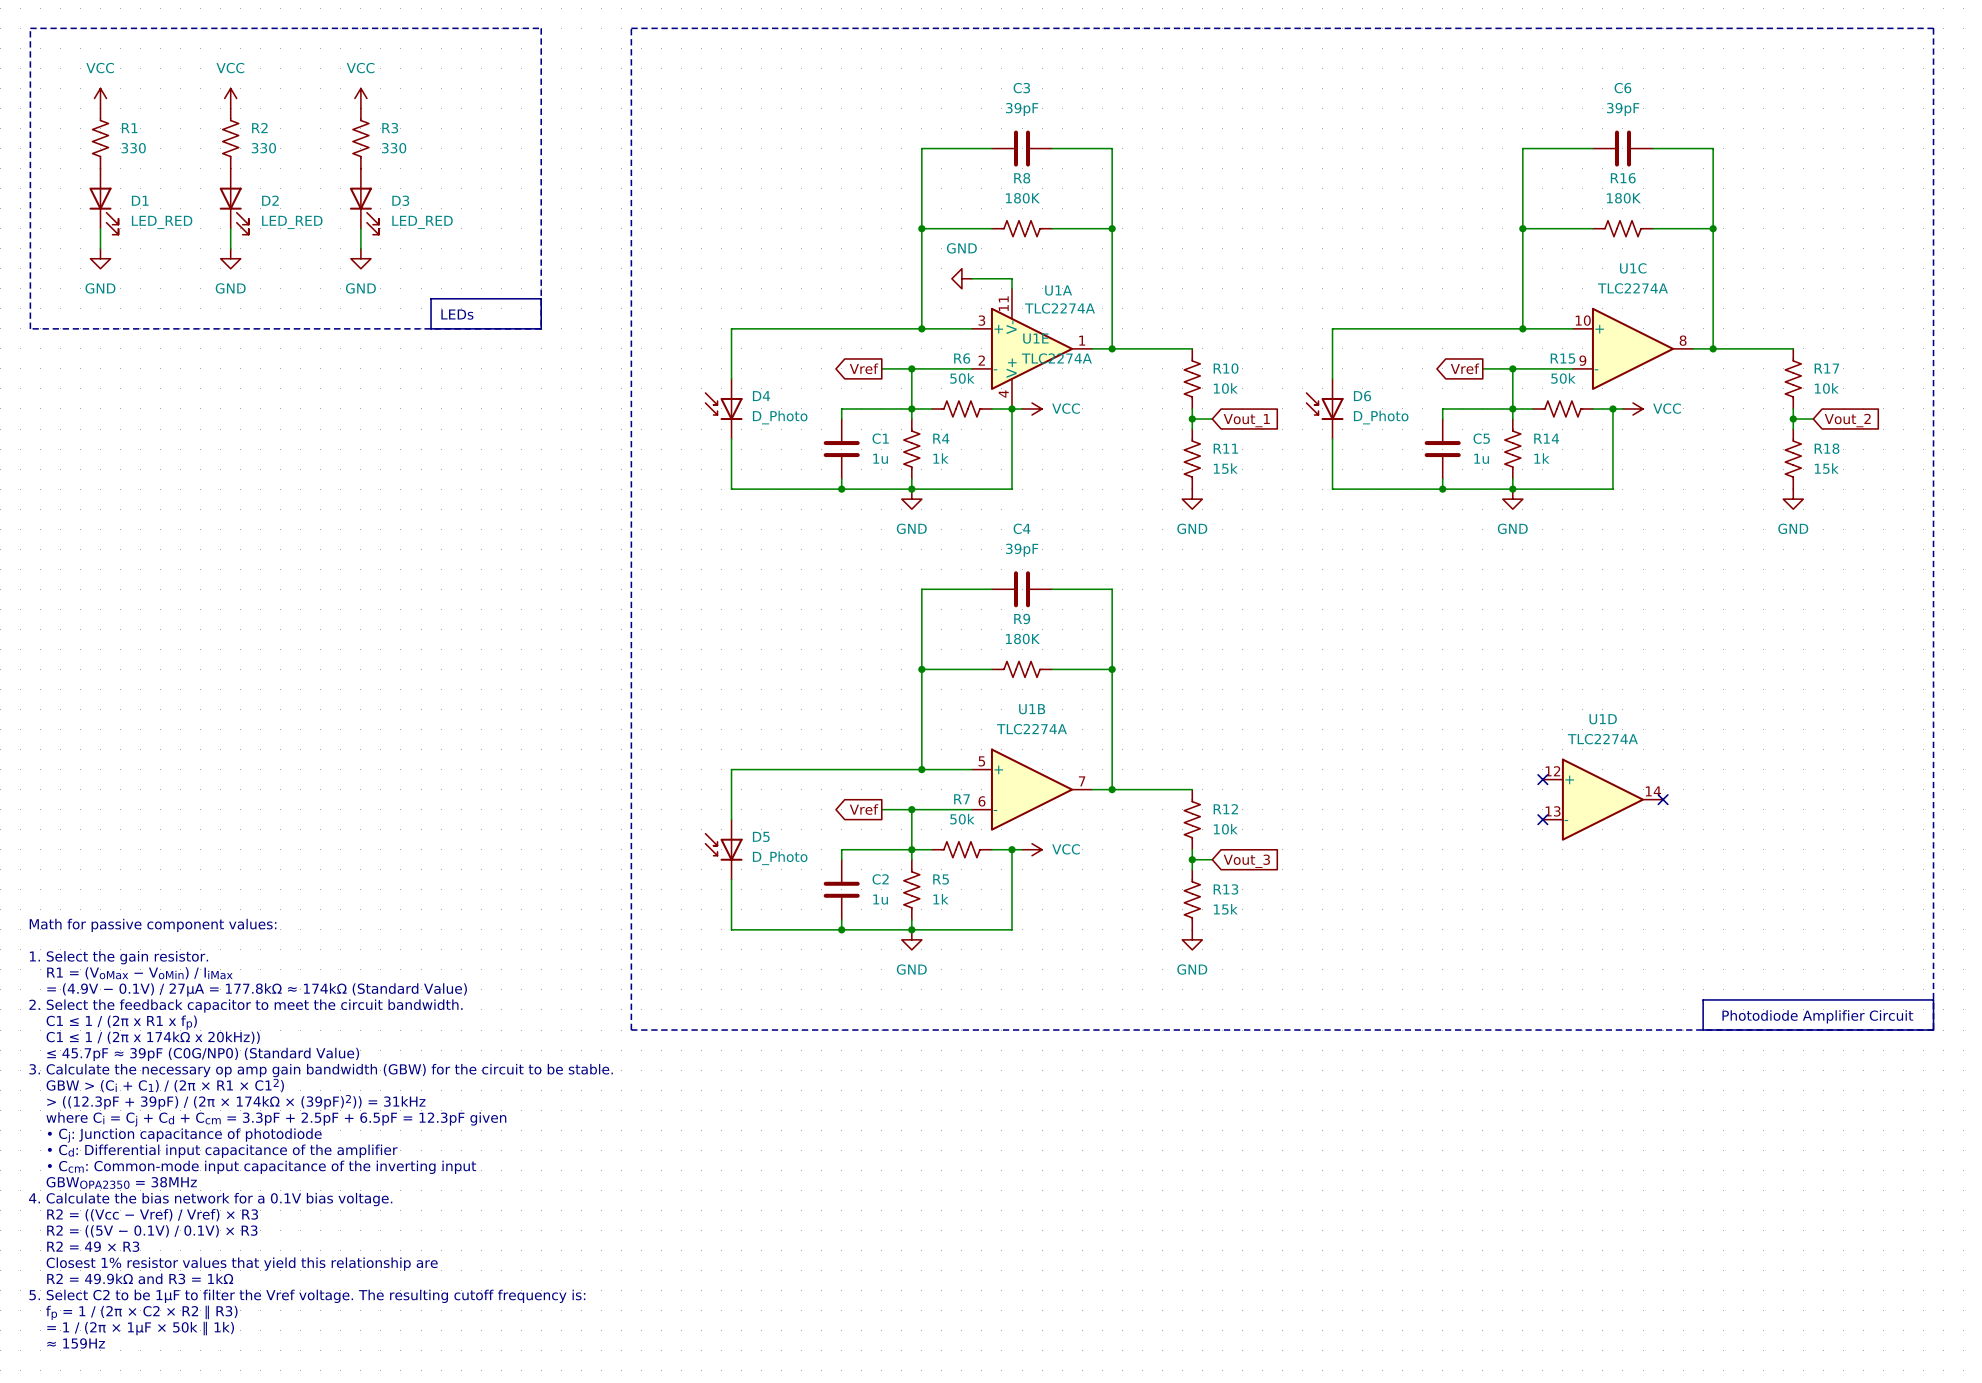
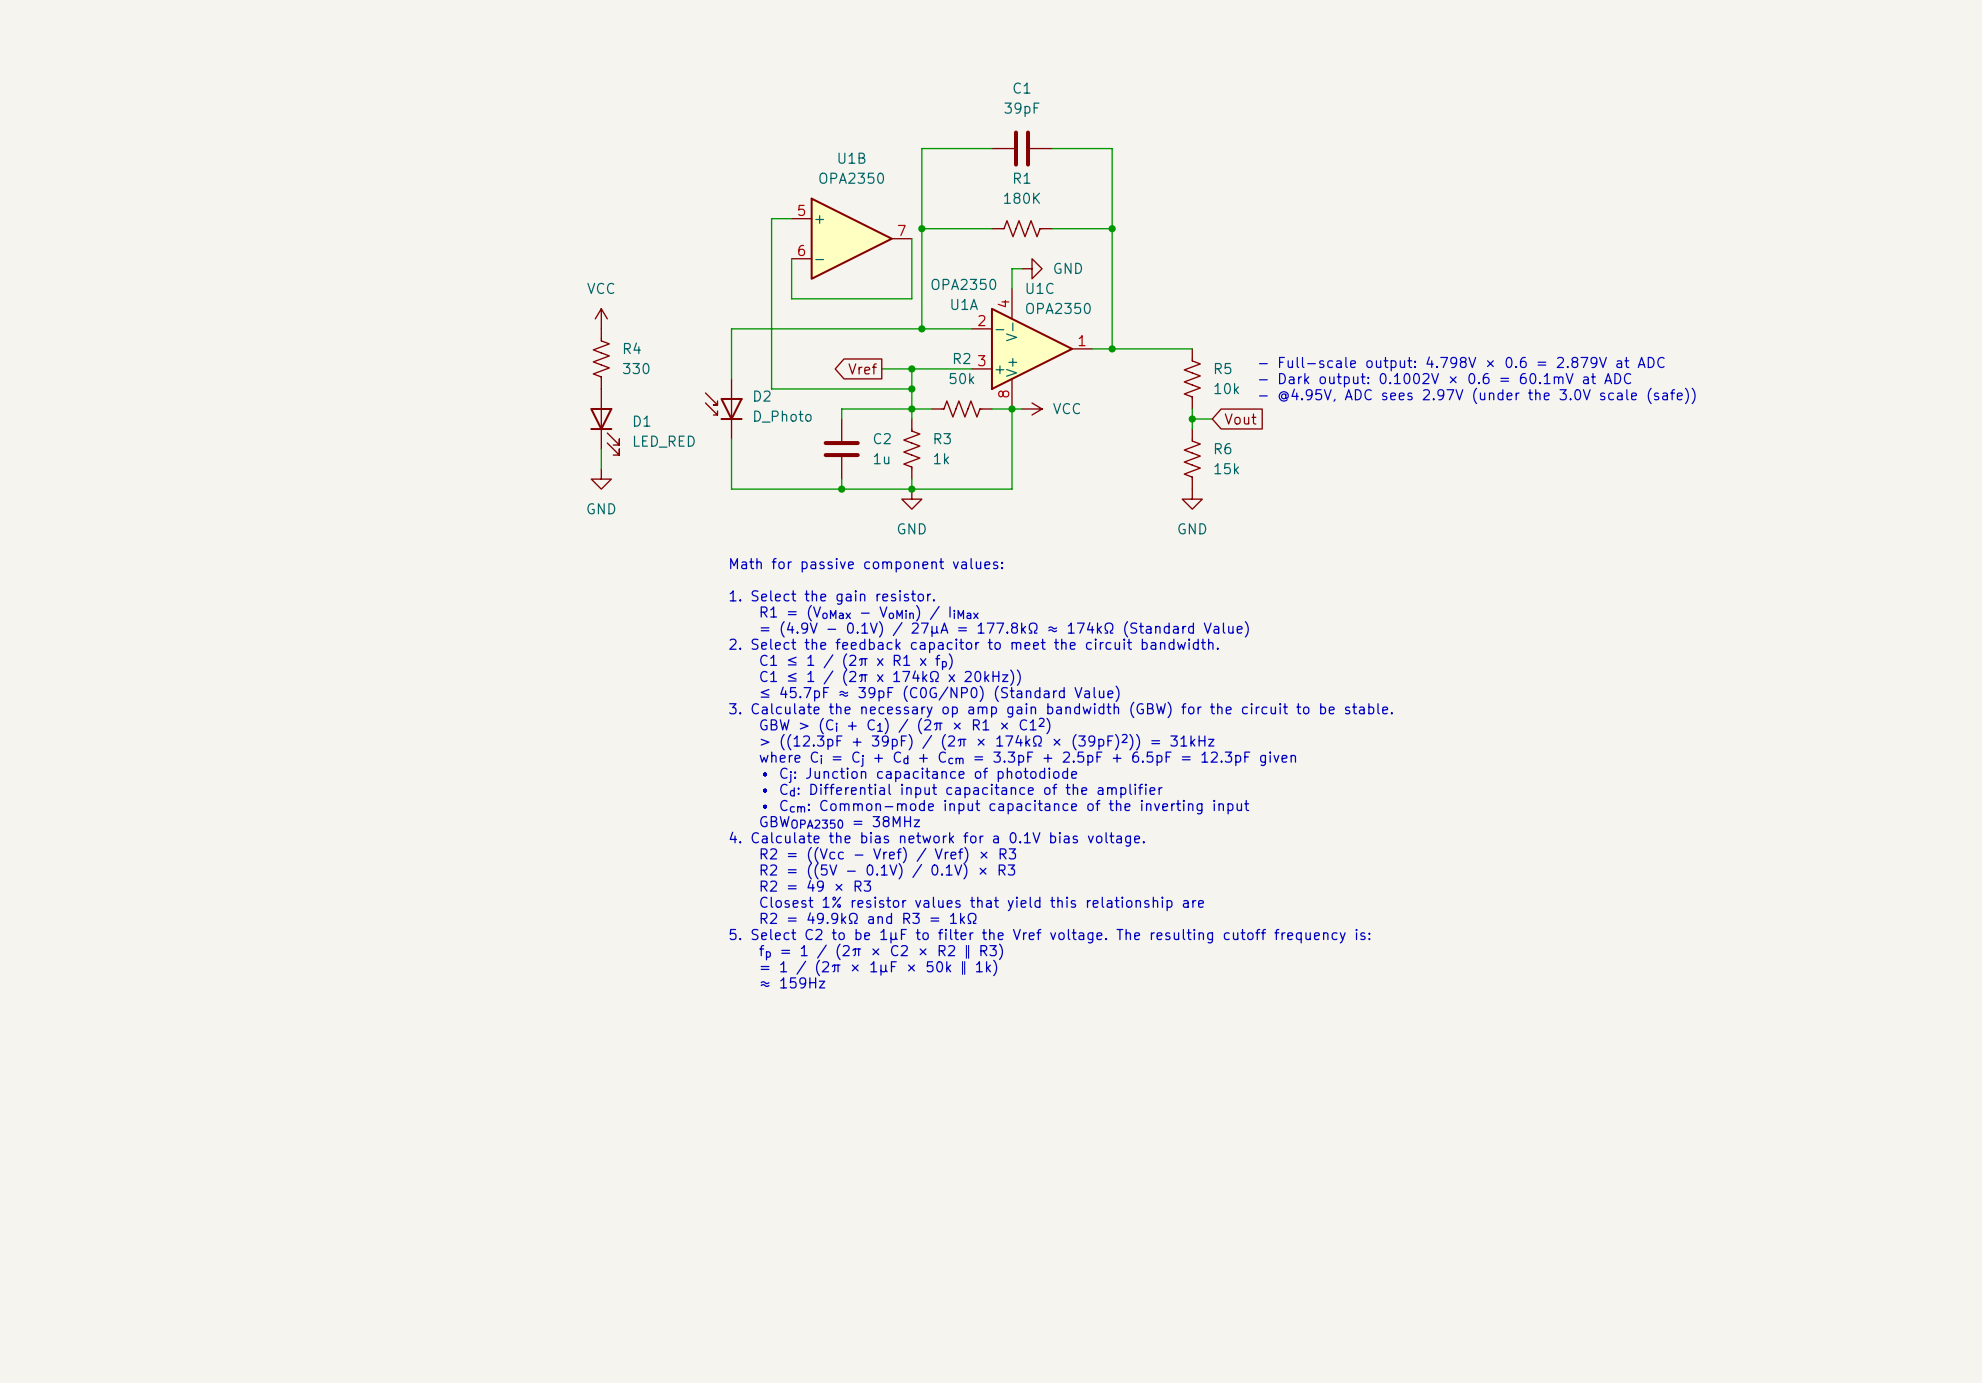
C3 name: C3 (1021, 88) -> C1 (1022, 88)
power symbol: VCC (100, 98) -> none
power symbol: VCC (230, 98) -> none
power symbol: VCC (360, 98) -> none
R1: 330 (100, 138) -> none
R2: 330 (230, 138) -> none
R3: 330 (360, 138) -> none
wire: (1592, 148) (1522, 148) (1522, 328) -> none
C6: 39pF (1622, 148) -> none
wire: (1653, 148) (1713, 148) (1713, 348) -> none
R8 name: R8 (1022, 178) -> R1 (1022, 178)
D1 position: (103, 201) -> (604, 422)
D2: LED_RED (234, 201) -> none
D3: LED_RED (364, 201) -> none
wire: none -> (791, 218) (771, 218) (771, 388) (911, 388)
wire: (100, 228) (100, 248) -> none
wire: (230, 228) (230, 248) -> none
wire: (360, 228) (360, 248) -> none
wire: (1522, 228) (1592, 228) -> none
junction: (1522, 228) -> none
R16: 180K (1622, 228) -> none
wire: (1653, 228) (1713, 228) -> none
junction: (1713, 228) -> none
wire: none -> (911, 238) (911, 298) (791, 298) (791, 258)
power symbol text position: GND (961, 248) -> GND (1068, 268)
power symbol: GND (100, 258) -> none
power symbol: GND (230, 258) -> none
power symbol: GND (360, 258) -> none
U1C name position: U1C (1633, 268) -> U1C (1040, 288)
power symbol rotation: 0° (961, 278) -> 180° (1032, 268)
power symbol position: GND (961, 278) -> GND (1032, 268)
wire: (971, 278) (1011, 278) -> (1022, 268) (1011, 268) (1011, 278)
U1C value: TLC2274A (1632, 288) -> OPA2350 (1058, 308)
U1A name position: U1A (1058, 290) -> U1A (964, 304)
U1C symbol: [1572, 307, 1694, 390] -> [1011, 288, 1012, 409]
U1A value: TLC2274A (1059, 308) -> OPA2350 (963, 284)
text: LEDs (457, 314) -> none
power symbol: none -> VCC (601, 318)
line: (541, 328) (541, 298) (431, 298) (431, 328) (541, 328) -> none
line: (541, 328) (541, 28) (30, 28) (30, 328) (541, 328) -> none
junction: (1522, 328) -> none
wire: (1572, 328) (1332, 328) (1332, 378) -> none
U1E: TLC2274A (1011, 348) -> none
U1A flip: as is (1032, 348) -> up-down (1032, 348)
wire: (1693, 348) (1793, 348) -> none
junction: (1713, 348) -> none
R4: none -> 330 (601, 358)
R6 name: R6 (962, 358) -> R2 (962, 358)
text: none -> - Full-scale output: 4.798V × 0.6 = 2.879V at ADC (1461, 363)
R10 name: R10 (1226, 368) -> R5 (1223, 368)
global label: Vref (1465, 368) -> none
wire: (1482, 368) (1572, 368) -> none
wire: (1512, 368) (1512, 419) -> none
junction: (1512, 368) -> none
R17: 10k (1793, 378) -> none
text: none -> - Dark output: 0.1002V × 0.6 = 60.1mV at ADC (1445, 380)
junction: none -> (911, 388)
text: none -> - @4.95V, ADC sees 2.97V (under the 3.0V scale (safe)) (1477, 395)
D4 name: D4 (761, 396) -> D2 (762, 396)
D6: D_Photo (1325, 408) -> none
junction: (1512, 408) -> none
wire: (1532, 408) (1442, 408) (1442, 419) -> none
R15: 50k (1562, 408) -> none
wire: (1592, 408) (1622, 408) -> none
wire: (1612, 408) (1612, 489) (1332, 489) (1332, 439) -> none
junction: (1612, 408) -> none
power symbol: VCC (1633, 408) -> none
wire: (1793, 408) (1793, 429) -> none
wire: (1793, 419) (1813, 419) -> none
junction: (1793, 419) -> none
global label: Vout_1 (1246, 420) -> Vout (1240, 419)
global label: Vout_2 (1847, 420) -> none
C1 name: C1 (880, 438) -> C2 (882, 438)
R4 name: R4 (941, 438) -> R3 (942, 438)
R11 name: R11 (1225, 448) -> R6 (1223, 448)
wire: none -> (601, 449) (601, 469)
C5: 1u (1442, 449) -> none
R14: 1k (1512, 449) -> none
R18: 15k (1793, 459) -> none
power symbol: none -> GND (601, 479)
wire: (1442, 479) (1442, 489) -> none
wire: (1512, 479) (1512, 489) -> none
junction: (1442, 489) -> none
junction: (1512, 489) -> none
power symbol: GND (1512, 499) -> none
power symbol: GND (1793, 499) -> none
text: none -> Math for passive component values: (866, 565)
wire: (991, 589) (921, 589) (921, 769) -> none
C4: 39pF (1022, 589) -> none
wire: (1052, 589) (1112, 589) (1112, 789) -> none
text: none -> 1. Select the gain resistor. (832, 597)
text: none -> R1 = (VoMax − VoMin) / IiMax (869, 613)
text: none -> = (4.9V − 0.1V) / 27μA = 177.8kΩ ≈ 174kΩ (Standard Value) (1004, 629)
text: none -> 2. Select the feedback capacitor to meet the circuit bandwidth. (973, 645)
text: none -> C1 ≤ 1 / (2π x R1 x fp) (856, 661)
wire: (921, 669) (991, 669) -> none
junction: (921, 669) -> none
R9: 180K (1022, 669) -> none
wire: (1052, 669) (1112, 669) -> none
junction: (1112, 669) -> none
text: none -> C1 ≤ 1 / (2π x 174kΩ x 20kHz)) (890, 677)
text: none -> ≤ 45.7pF ≈ 39pF (C0G/NP0) (Standard Value) (940, 693)
text: none -> 3. Calculate the necessary op amp gain bandwidth (GBW) for the circuit to be stable. (1061, 709)
text: none -> GBW > (Ci + C1) / (2π × R1 × C12) (905, 726)
U1B value: TLC2274A (1031, 729) -> OPA2350 (851, 178)
text: none -> > ((12.3pF + 39pF) / (2π × 174kΩ × (39pF)2)) = 31kHz (987, 742)
text: none -> where Ci = Cj + Cd + Ccm = 3.3pF + 2.5pF + 6.5pF = 12.3pF given (1027, 759)
junction: (921, 769) -> none
wire: (971, 769) (731, 769) (731, 819) -> none
text: none -> • Cj: Junction capacitance of photodiode (920, 775)
no-connect mark: (1542, 779) -> none
U1B position: (1032, 789) -> (851, 238)
wire: (1092, 789) (1192, 789) -> none
junction: (1112, 789) -> none
text: none -> • Cd: Differential input capacitance of the amplifier (962, 791)
U1D: TLC2274A (1602, 799) -> none
no-connect mark: (1663, 799) -> none
text: none -> • Ccm: Common-mode input capacitance of the inverting input (1006, 807)
global label: Vref (864, 809) -> none
wire: (881, 809) (971, 809) -> none
wire: (911, 809) (911, 859) -> none
junction: (911, 809) -> none
R12: 10k (1192, 819) -> none
no-connect mark: (1542, 819) -> none
text: none -> GBWOPA2350 = 38MHz (840, 822)
text: none -> 4. Calculate the bias network for a 0.1V bias voltage. (937, 839)
D5: D_Photo (724, 849) -> none
junction: (911, 849) -> none
wire: (931, 849) (841, 849) (841, 859) -> none
R7: 50k (961, 849) -> none
wire: (991, 849) (1022, 849) -> none
wire: (1011, 849) (1011, 929) (731, 929) (731, 879) -> none
junction: (1011, 849) -> none
power symbol: VCC (1032, 849) -> none
wire: (1192, 849) (1192, 869) -> none
text: none -> R2 = ((Vcc − Vref) / Vref) × R3 (888, 855)
wire: (1192, 859) (1212, 859) -> none
junction: (1192, 859) -> none
global label: Vout_3 (1246, 861) -> none
text: none -> R2 = ((5V − 0.1V) / 0.1V) × R3 (887, 871)
text: none -> R2 = 49 × R3 (815, 885)
C2: 1u (841, 889) -> none
R5: 1k (911, 889) -> none
R13: 15k (1192, 899) -> none
text: none -> Closest 1% resistor values that yield this relationship are (982, 903)
text: none -> R2 = 49.9kΩ and R3 = 1kΩ (868, 918)
wire: (841, 919) (841, 929) -> none
wire: (911, 919) (911, 929) -> none
text: Math for passive component values: (153, 925) -> none
junction: (841, 929) -> none
junction: (911, 929) -> none
text: none -> 5. Select C2 to be 1μF to filter the Vref voltage. The resulting cutoff frequency is: (1050, 936)
power symbol: GND (911, 939) -> none
power symbol: GND (1192, 939) -> none
text: none -> fp = 1 / (2π × C2 × R2 ∥ R3) (881, 952)
text: 1. Select the gain resistor. (118, 957) -> none
text: none -> = 1 / (2π × 1μF × 50k ∥ 1k) (878, 967)
text: R1 = (VoMax − VoMin) / IiMax (139, 973) -> none
text: none -> ≈ 159Hz (792, 982)
text: = (4.9V − 0.1V) / 27μA = 177.8kΩ ≈ 174kΩ (Standard Value) (257, 989) -> none
text: 2. Select the feedback capacitor to meet the circuit bandwidth. (245, 1006) -> none
text: Photodiode Amplifier Circuit (1817, 1016) -> none
text: C1 ≤ 1 / (2π x R1 x fp) (121, 1022) -> none
line: (1933, 1030) (1933, 999) (1703, 999) (1703, 1030) (1933, 1030) -> none
line: (1933, 1030) (1933, 28) (631, 28) (631, 1030) (1933, 1030) -> none
text: C1 ≤ 1 / (2π x 174kΩ x 20kHz)) (153, 1037) -> none
text: ≤ 45.7pF ≈ 39pF (C0G/NP0) (Standard Value) (203, 1054) -> none
text: 3. Calculate the necessary op amp gain bandwidth (GBW) for the circuit to be stable. (321, 1070) -> none
text: GBW > (Ci + C1) / (2π × R1 × C12) (165, 1085) -> none
text: > ((12.3pF + 39pF) / (2π × 174kΩ × (39pF)2)) = 31kHz (236, 1102) -> none
text: where Ci = Cj + Cd + Ccm = 3.3pF + 2.5pF + 6.5pF = 12.3pF given (276, 1119) -> none
text: • Cj: Junction capacitance of photodiode (184, 1135) -> none
text: • Cd: Differential input capacitance of the amplifier (222, 1151) -> none
text: • Ccm: Common-mode input capacitance of the inverting input (262, 1167) -> none
text: GBWOPA2350 = 38MHz (121, 1182) -> none
text: 4. Calculate the bias network for a 0.1V bias voltage. (210, 1199) -> none
text: R2 = ((Vcc − Vref) / Vref) × R3 (152, 1215) -> none
text: R2 = ((5V − 0.1V) / 0.1V) × R3 (152, 1231) -> none
text: R2 = 49 × R3 (93, 1246) -> none
text: Closest 1% resistor values that yield this relationship are (242, 1264) -> none
text: R2 = 49.9kΩ and R3 = 1kΩ (140, 1278) -> none
text: 5. Select C2 to be 1μF to filter the Vref voltage. The resulting cutoff frequency is: (307, 1296) -> none
text: fp = 1 / (2π × C2 × R2 ∥ R3) (141, 1312) -> none
text: = 1 / (2π × 1μF × 50k ∥ 1k) (140, 1328) -> none
text: ≈ 159Hz (76, 1343) -> none

